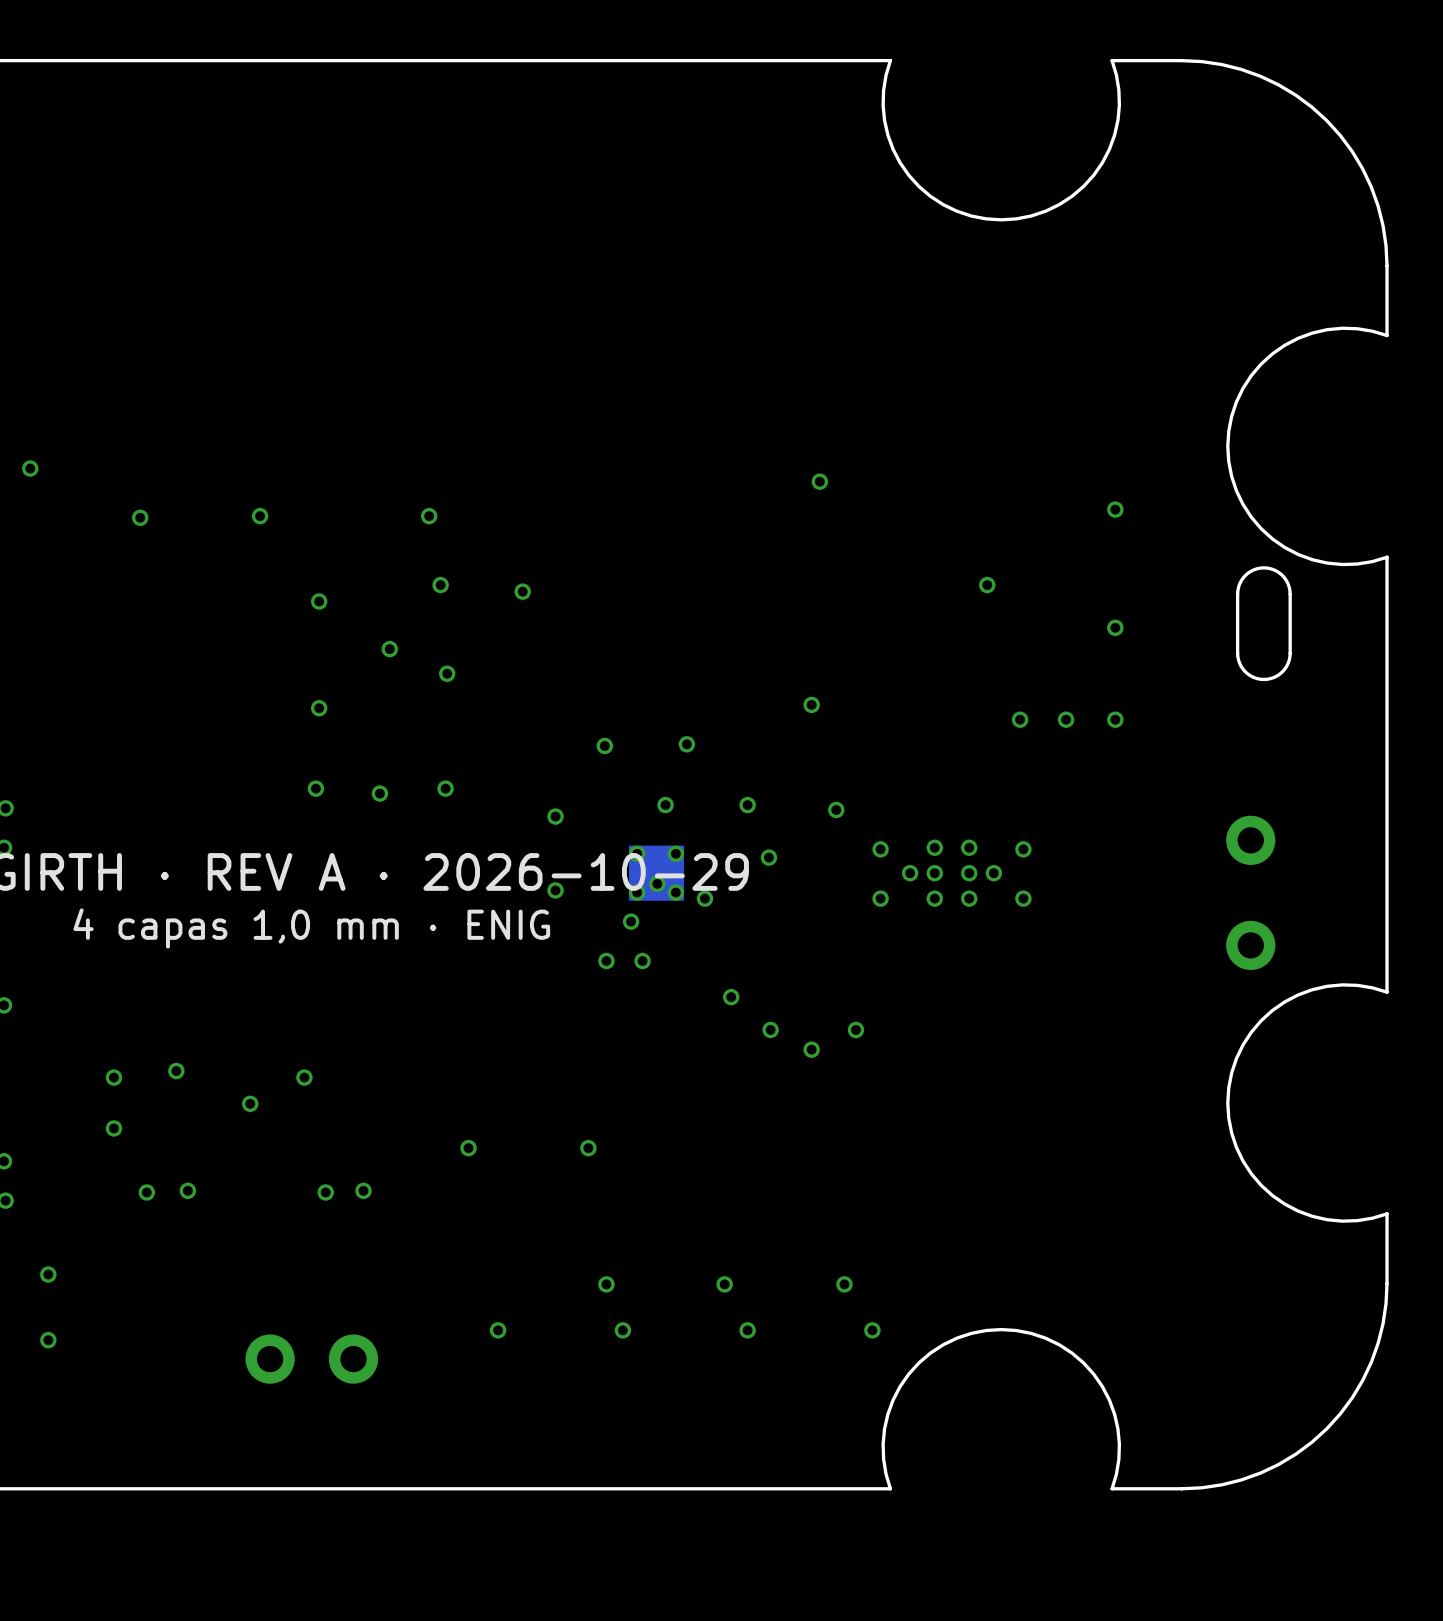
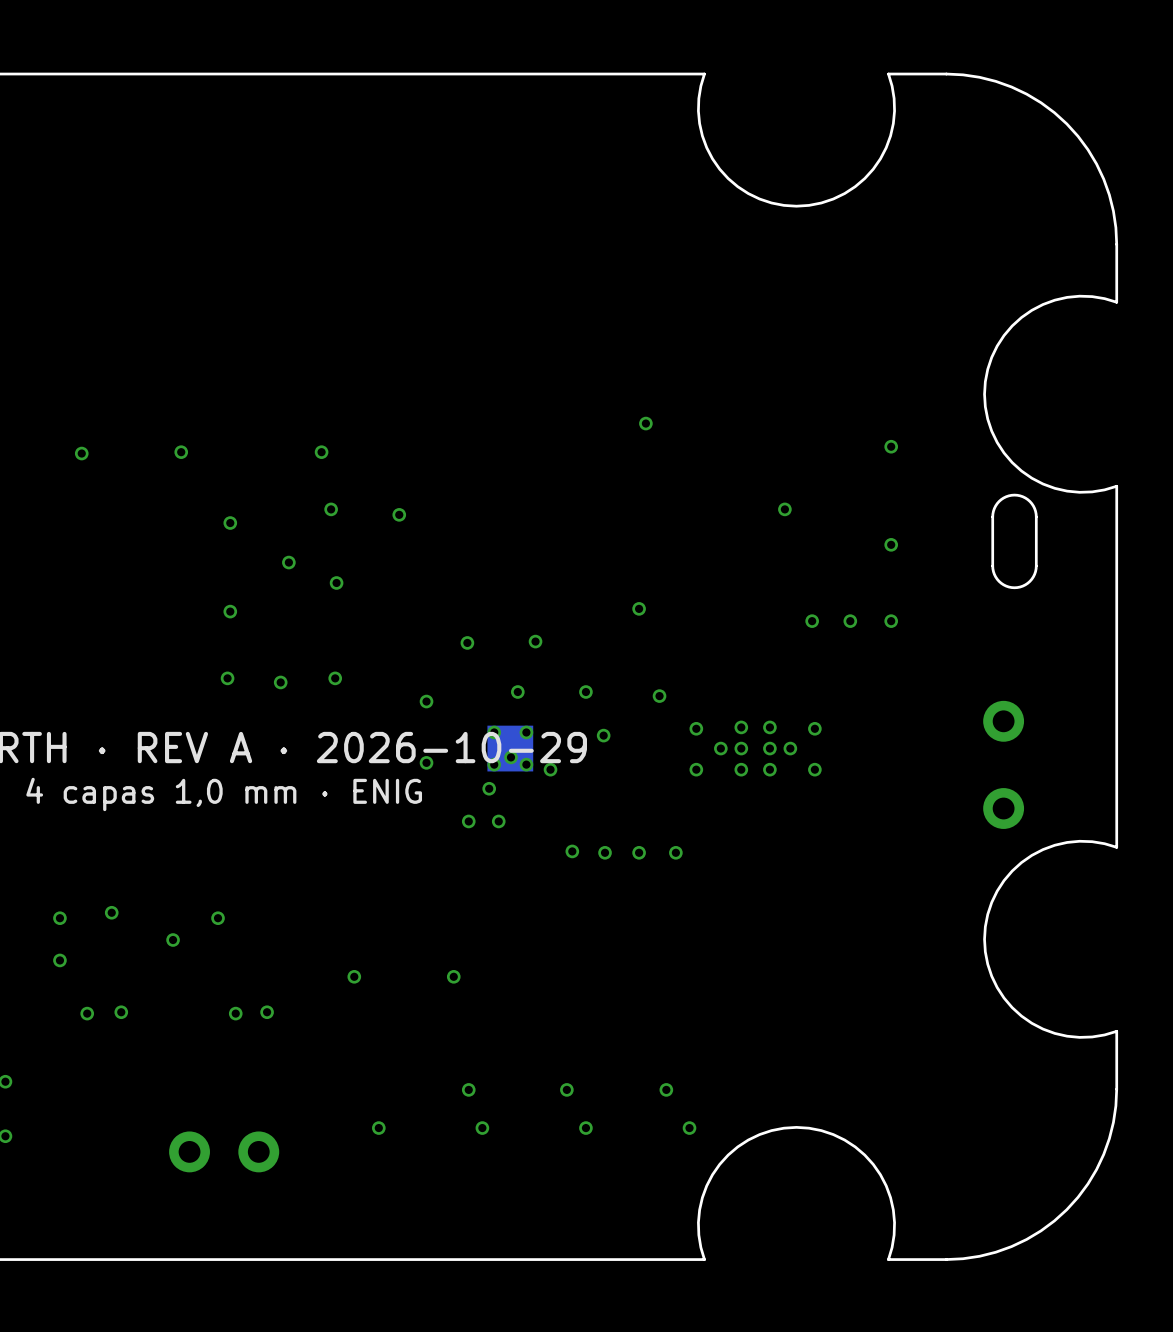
via: none -> (605, 852)
via: none -> (639, 852)
via: none -> (675, 852)
via: (770, 1029) -> none
via: (855, 1029) -> none
via: (811, 1049) -> none

